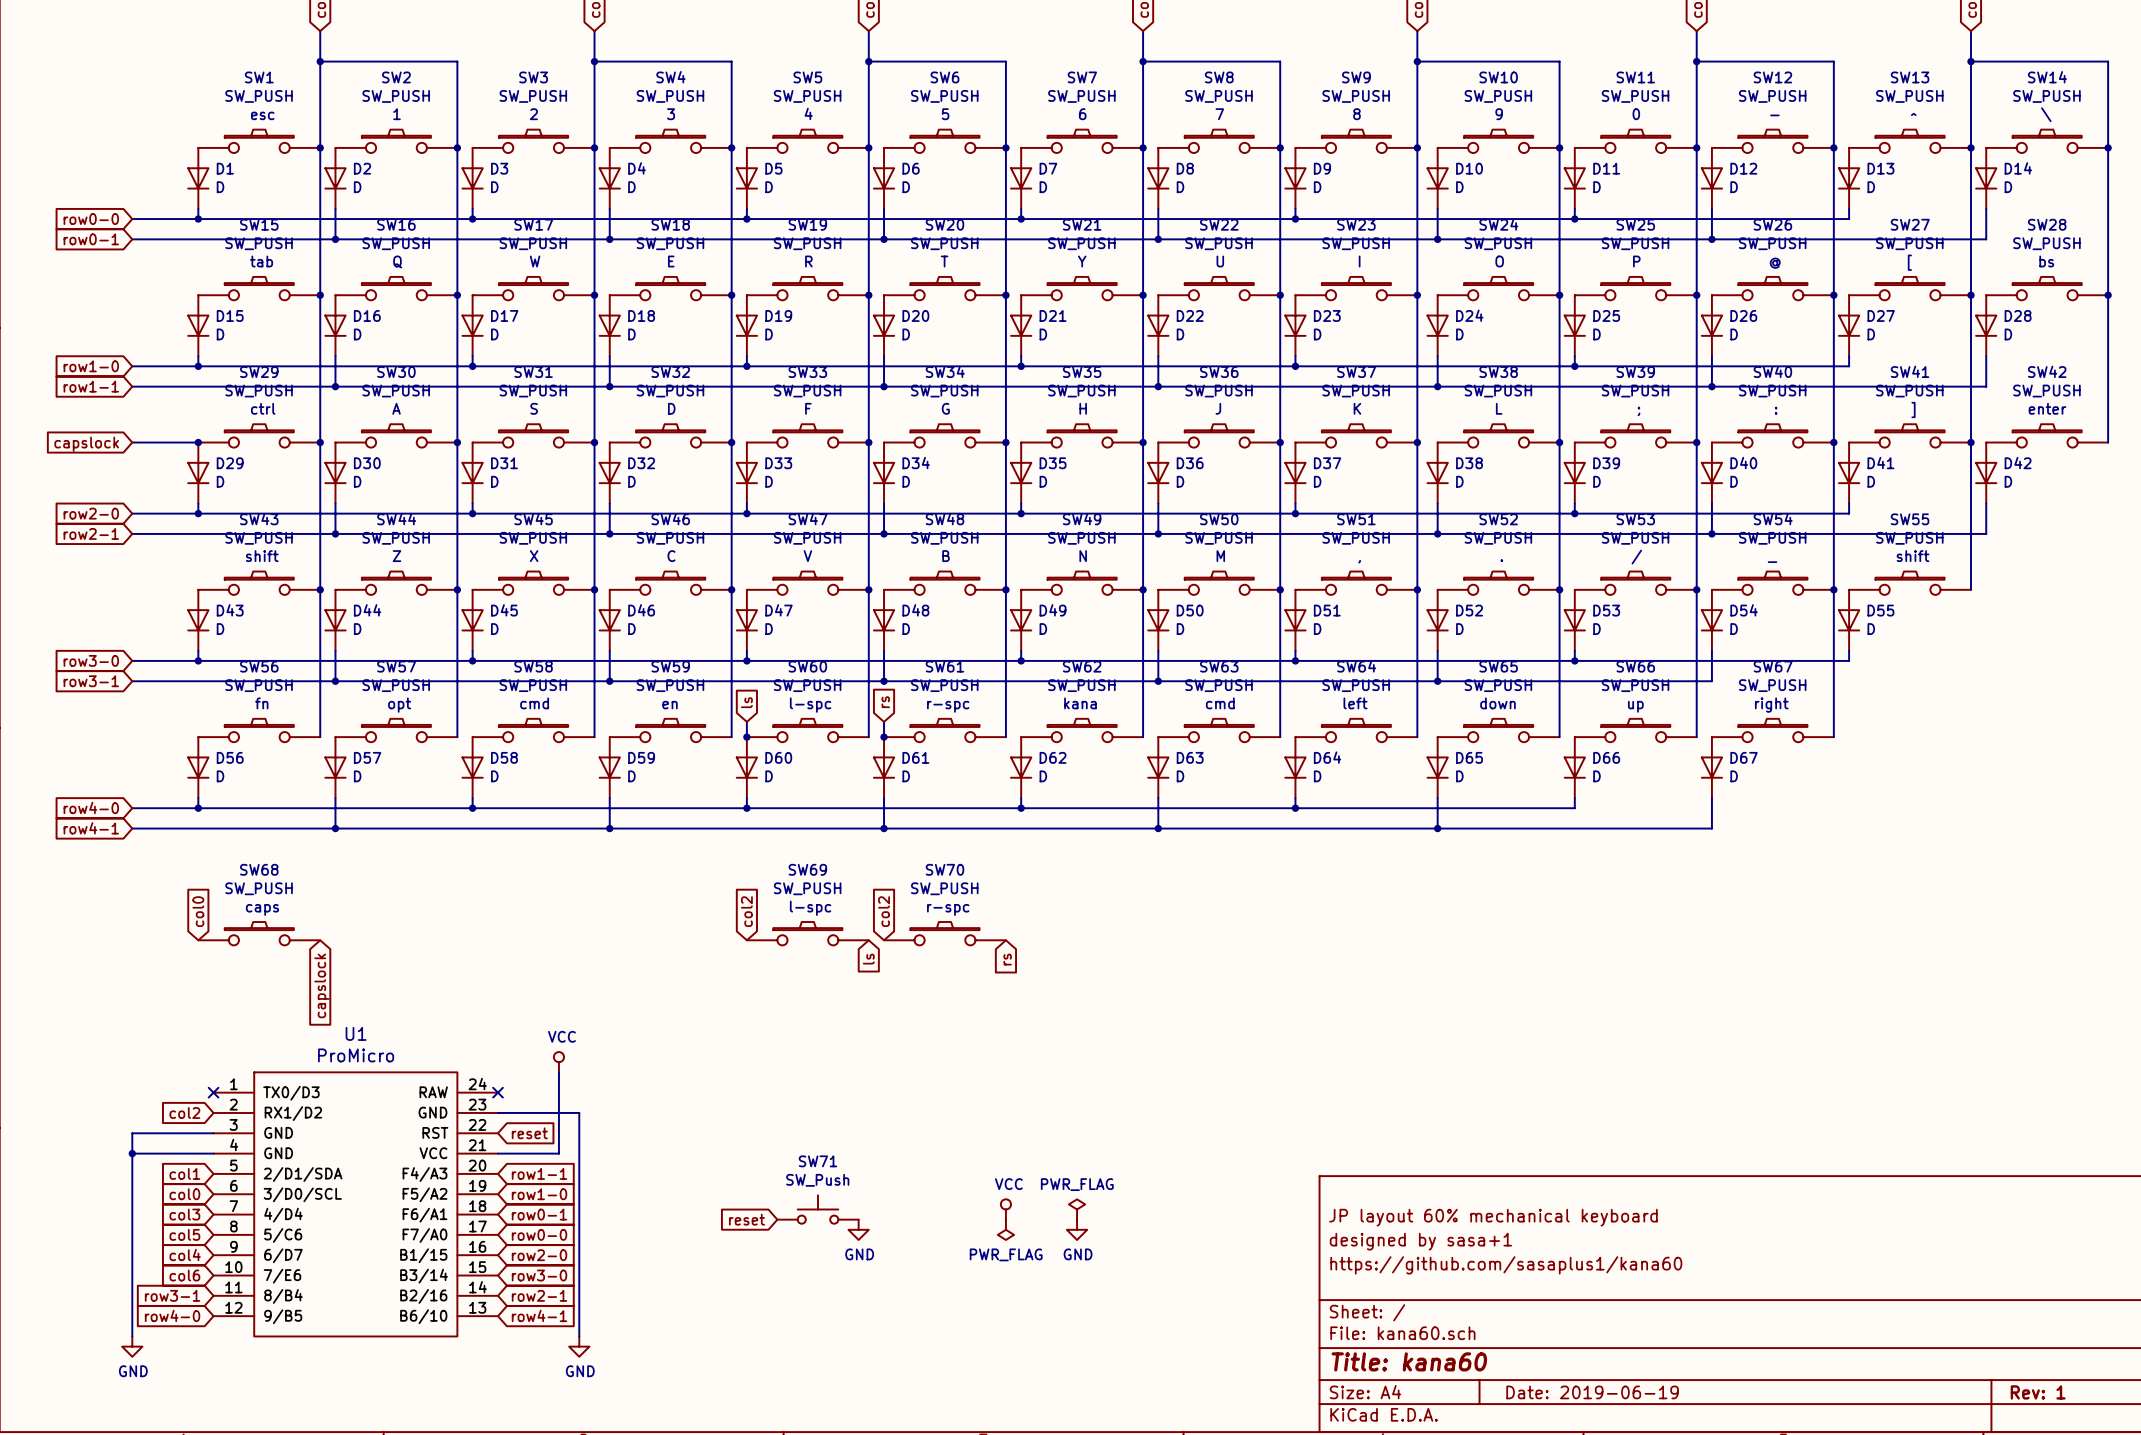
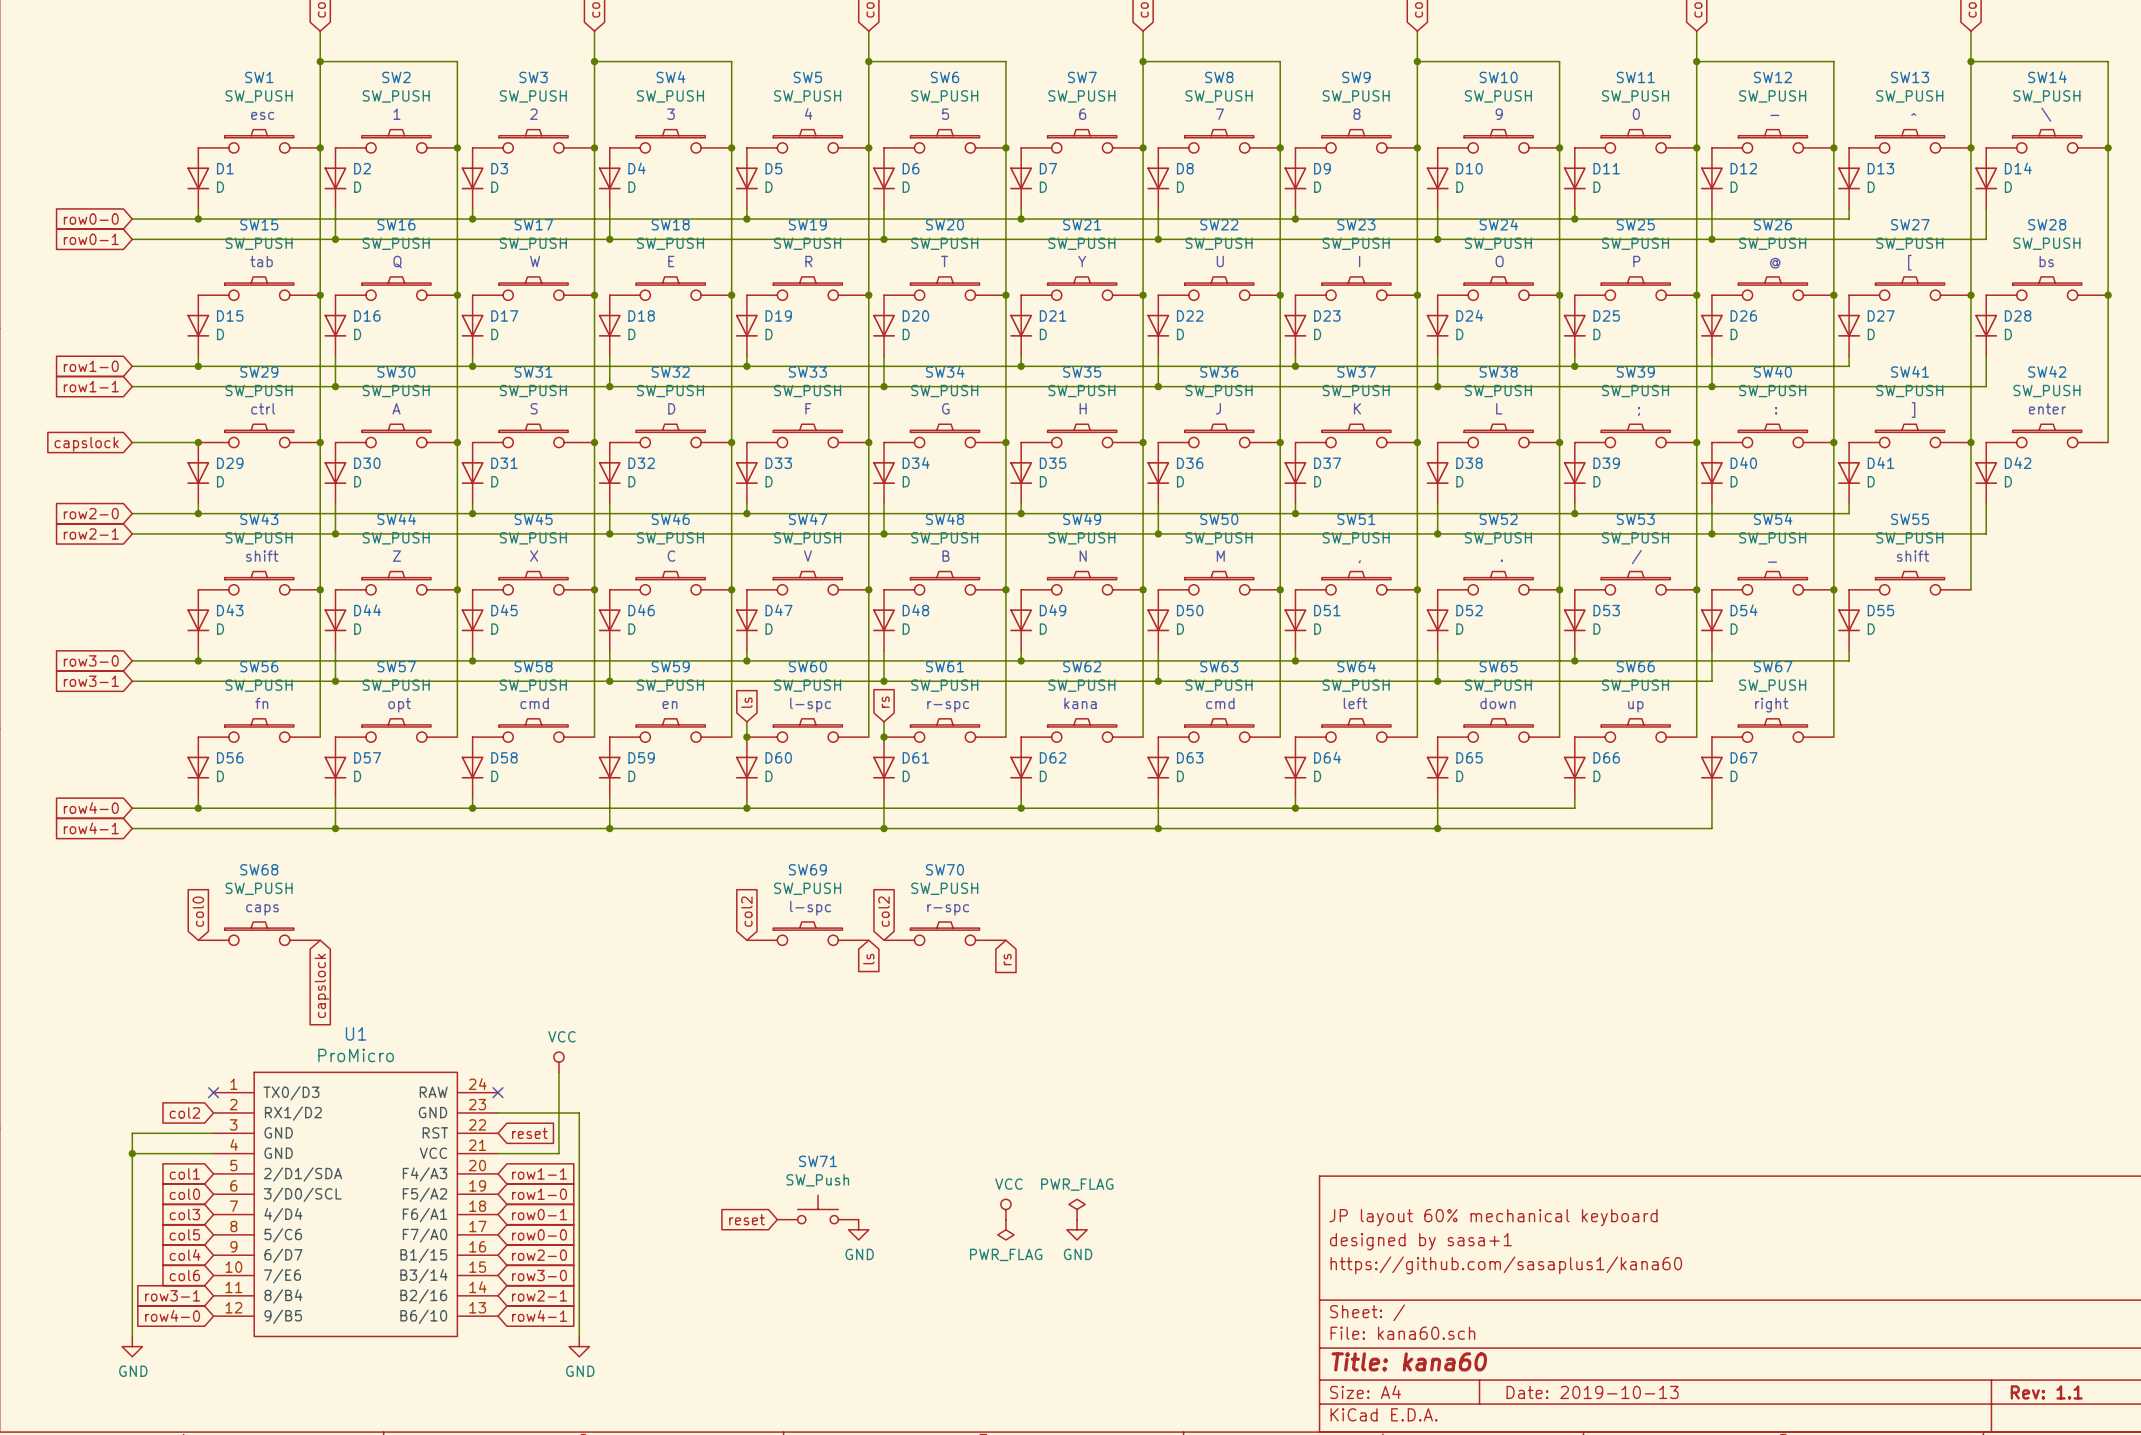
title block: Date: 2019-06-19 (1592, 1392) -> Date: 2019-10-13 (1592, 1392)
title block: Rev: 1 (2038, 1392) -> Rev: 1.1 (2046, 1392)

